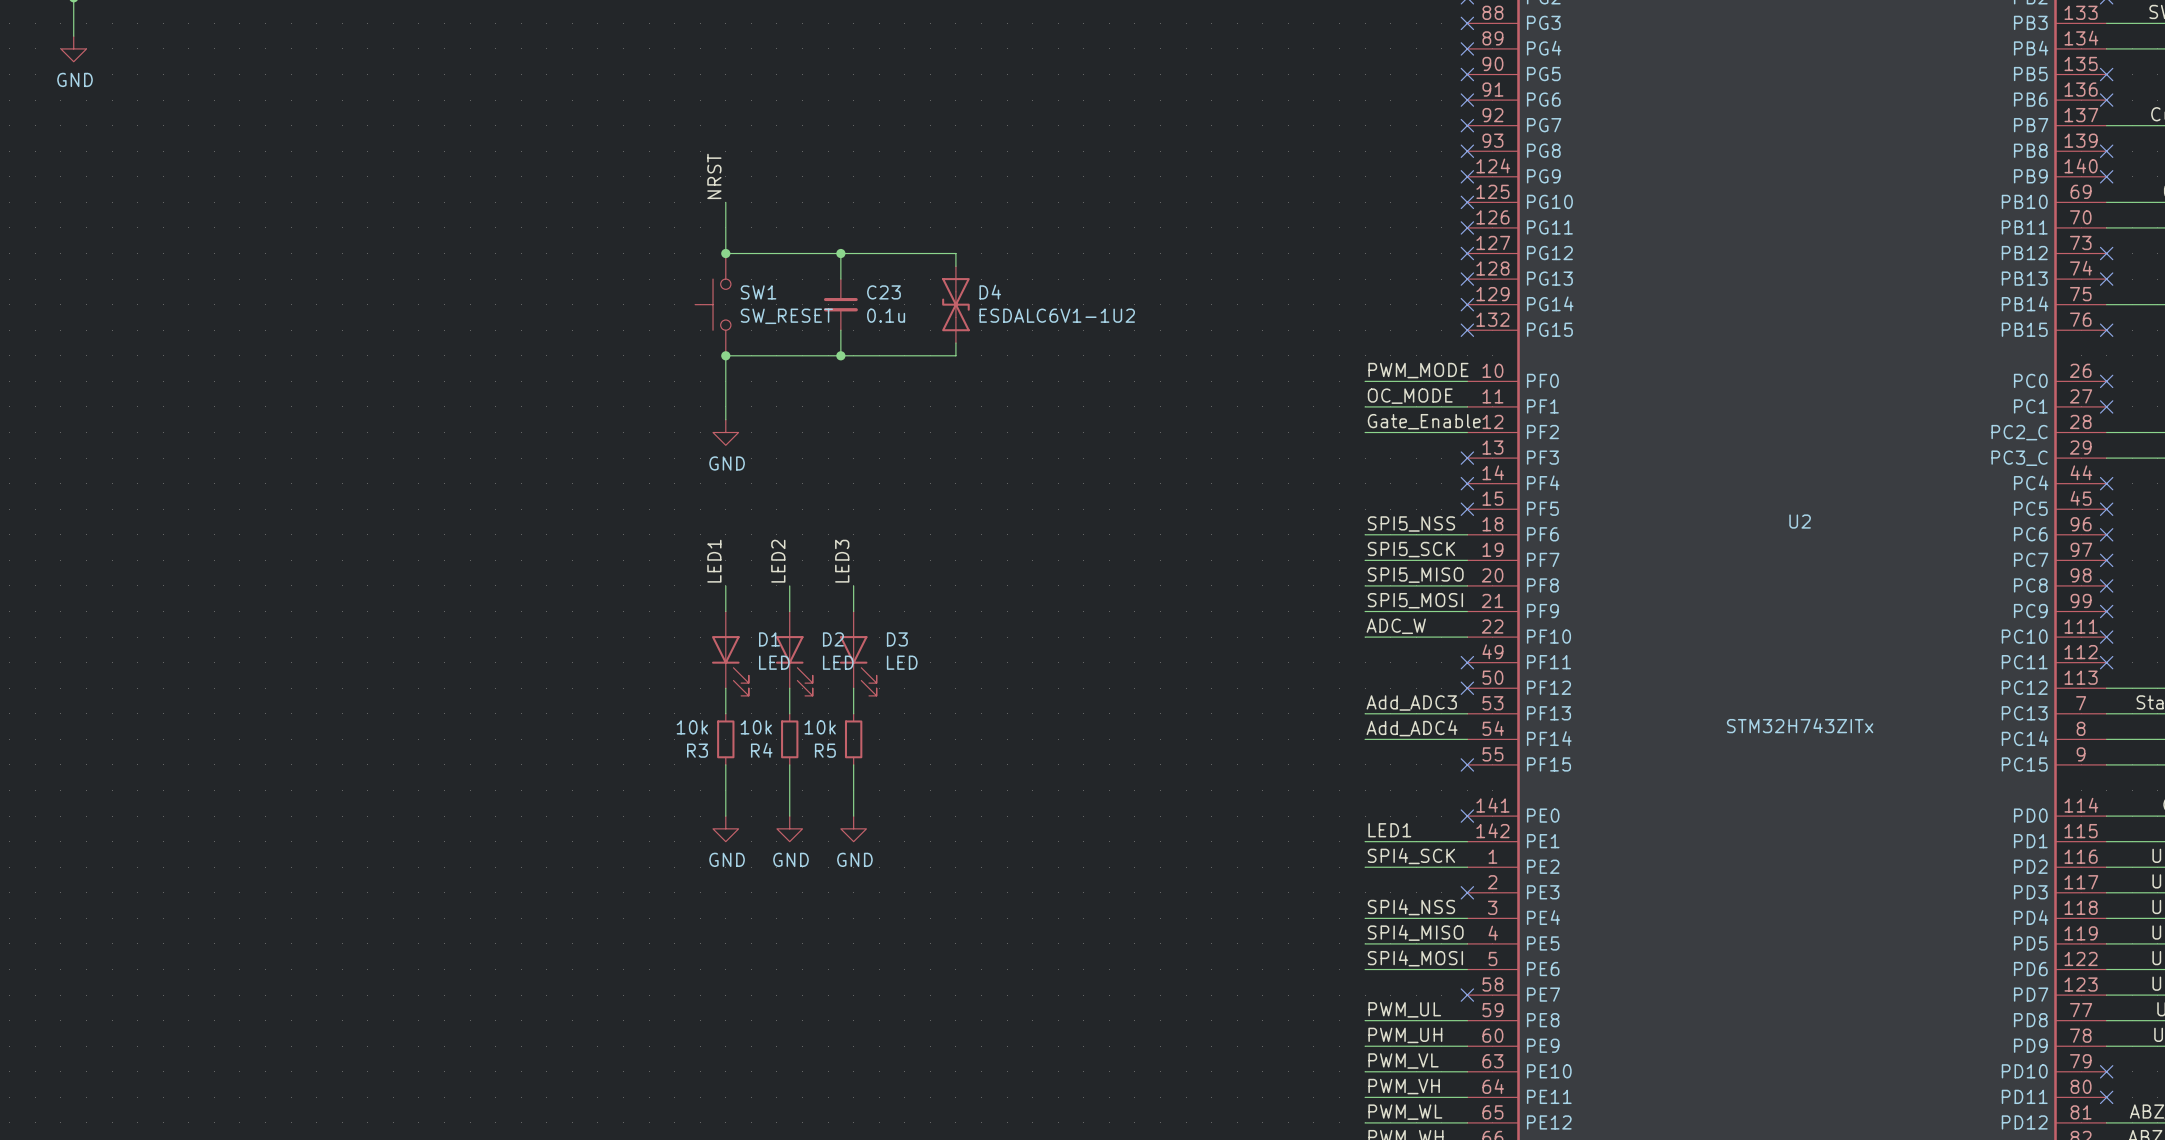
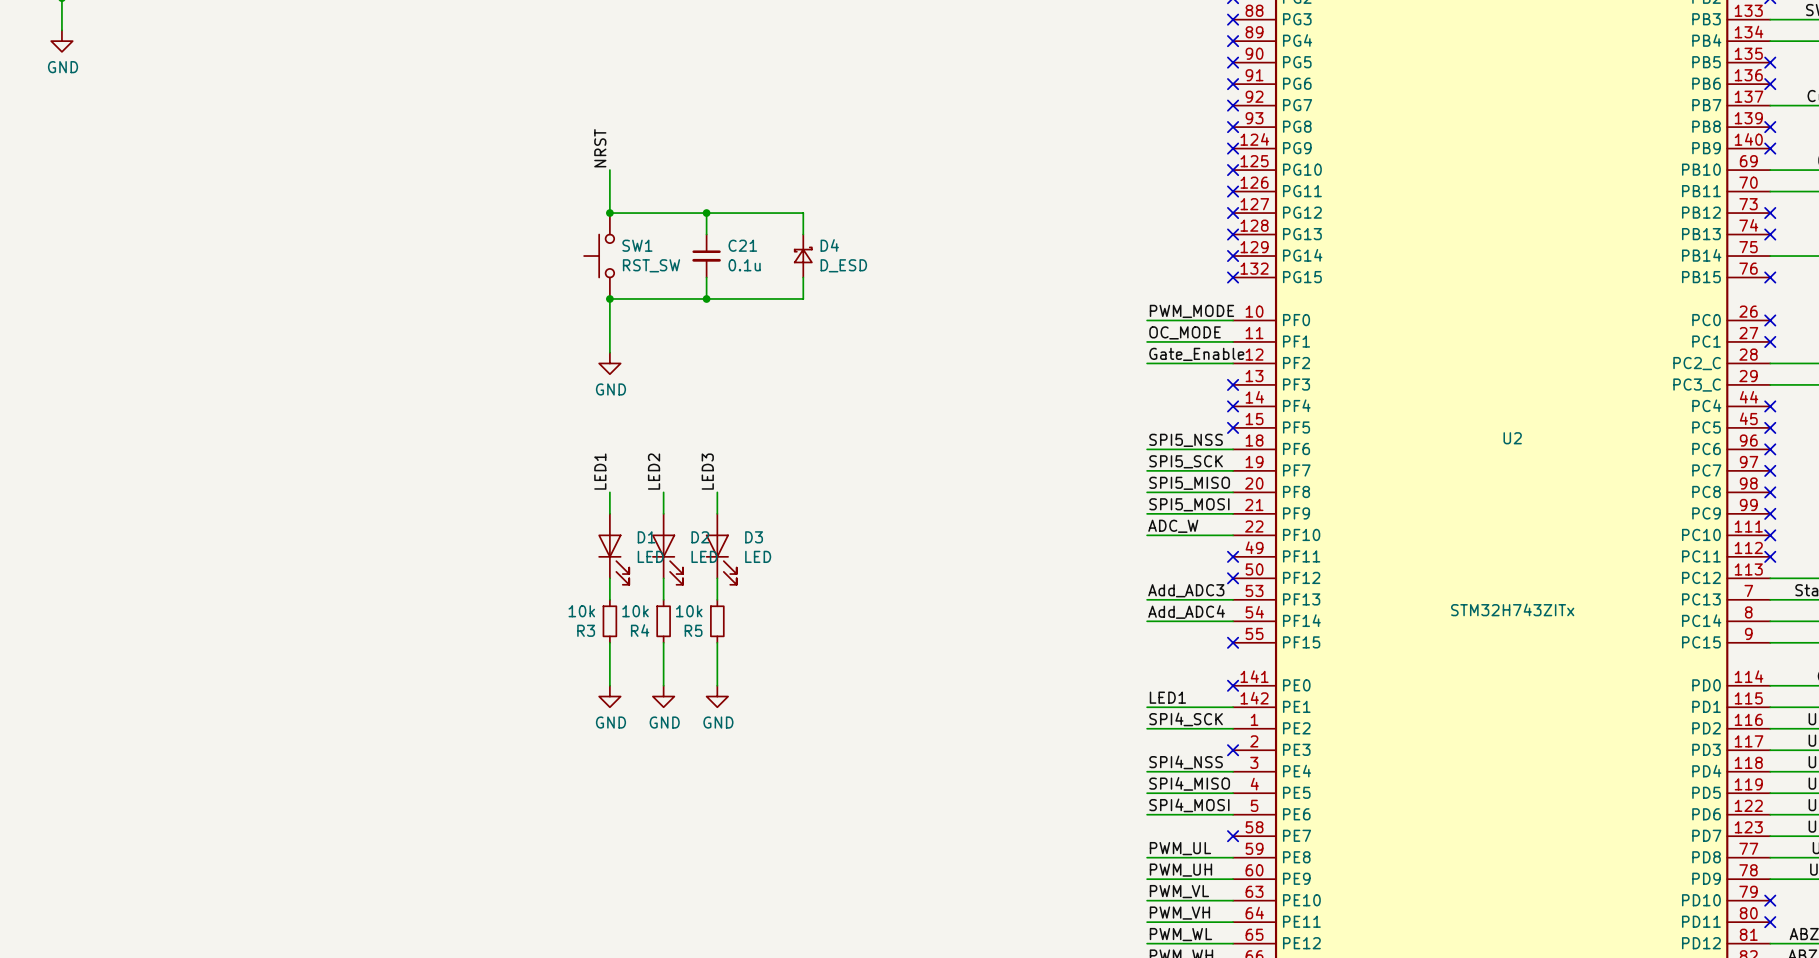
D4 symbol: [942, 266, 970, 344] -> [794, 234, 812, 278]
C23 name: C23 (883, 292) -> C21 (742, 245)
D4 value: ESDALC6V1-1U2 (1057, 315) -> D_ESD (843, 265)
SW1 value: SW_RESET (786, 316) -> RST_SW (651, 265)

